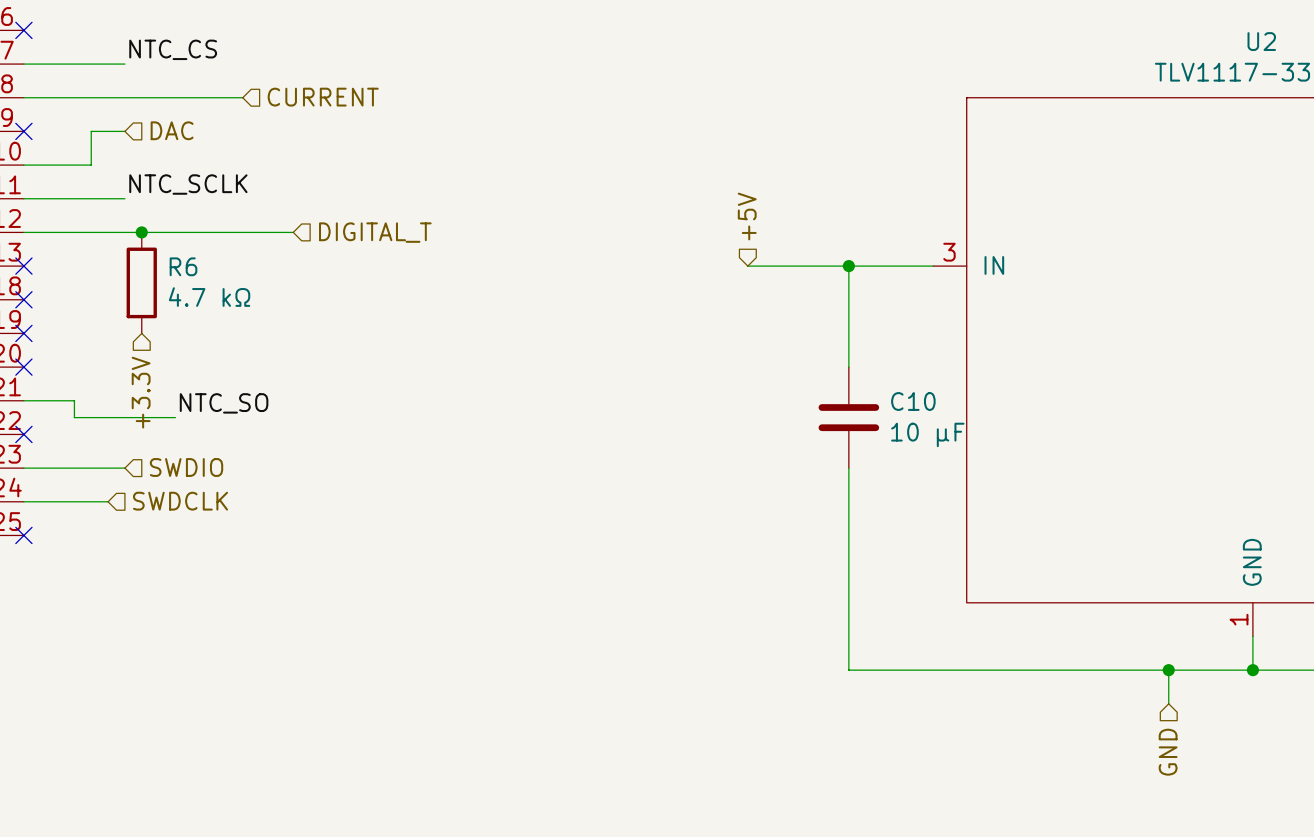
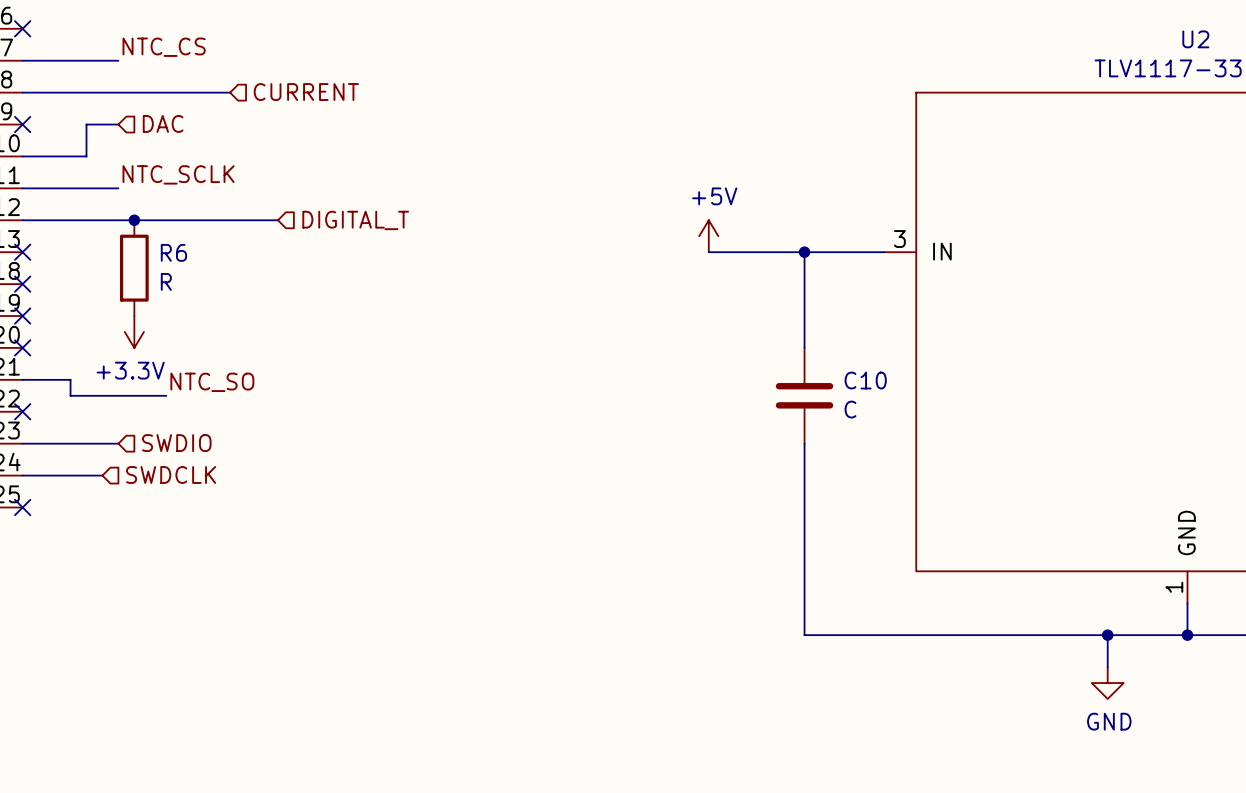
hierarchical label: +5V (747, 216) -> none
power symbol: none -> +5V (708, 236)
R6 value: 4.7 kΩ (209, 297) -> R (166, 281)
power symbol: none -> +3.3V (134, 331)
hierarchical label: +3.3V (141, 392) -> none
C10 value: 10 μF (927, 434) -> C (850, 409)
power symbol: none -> GND (1107, 683)
hierarchical label: GND (1168, 752) -> none

